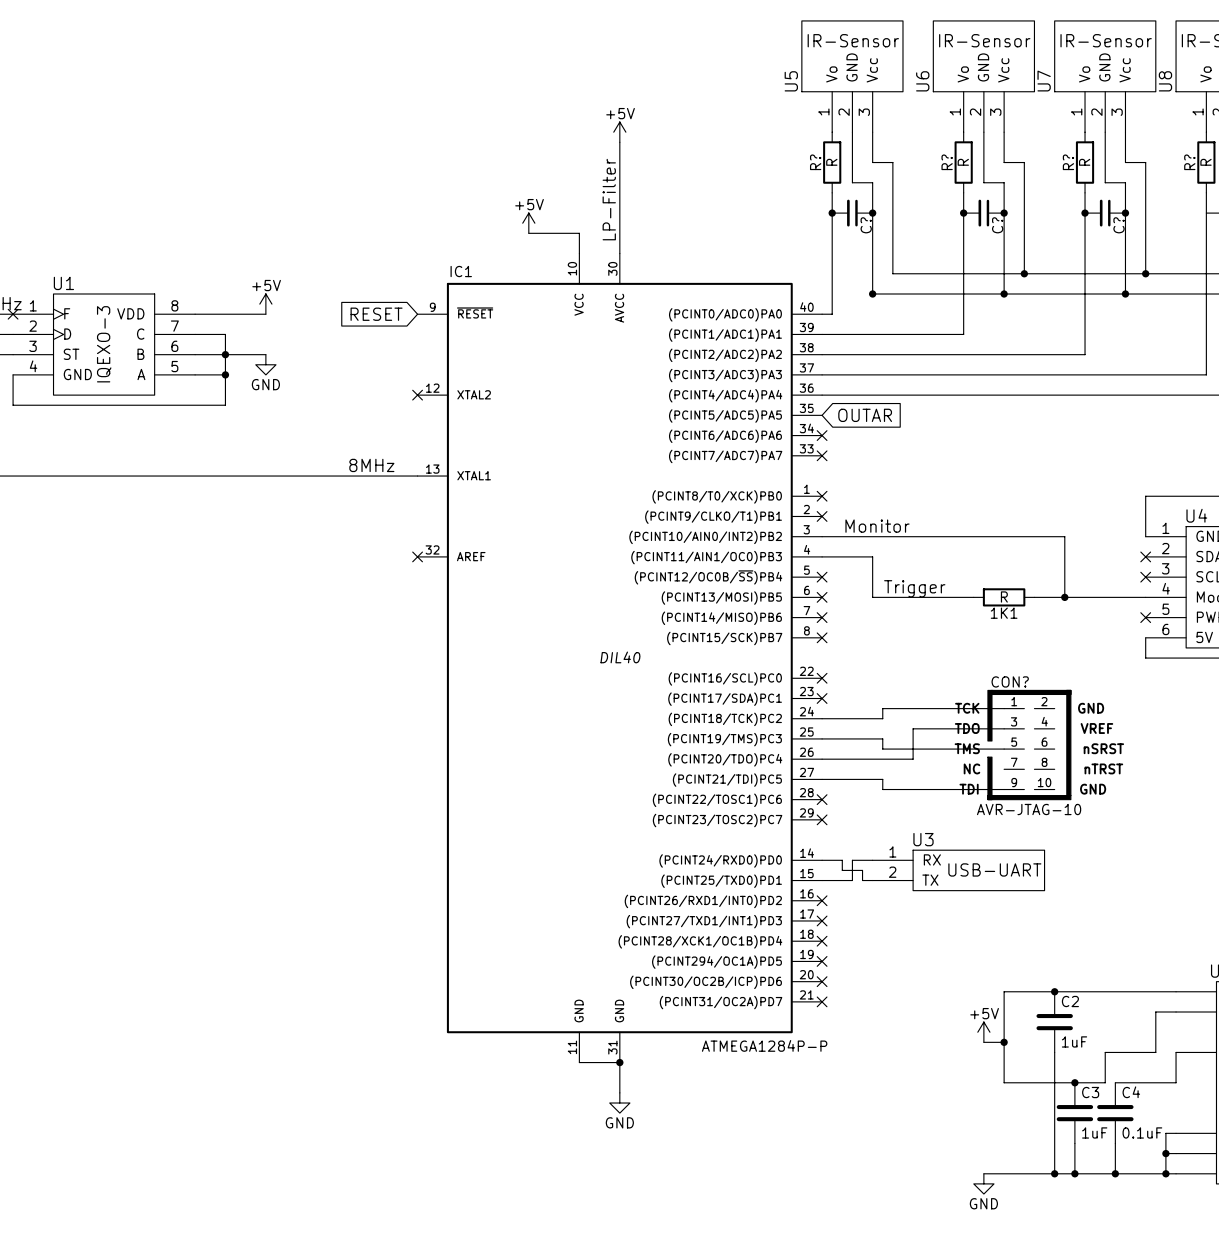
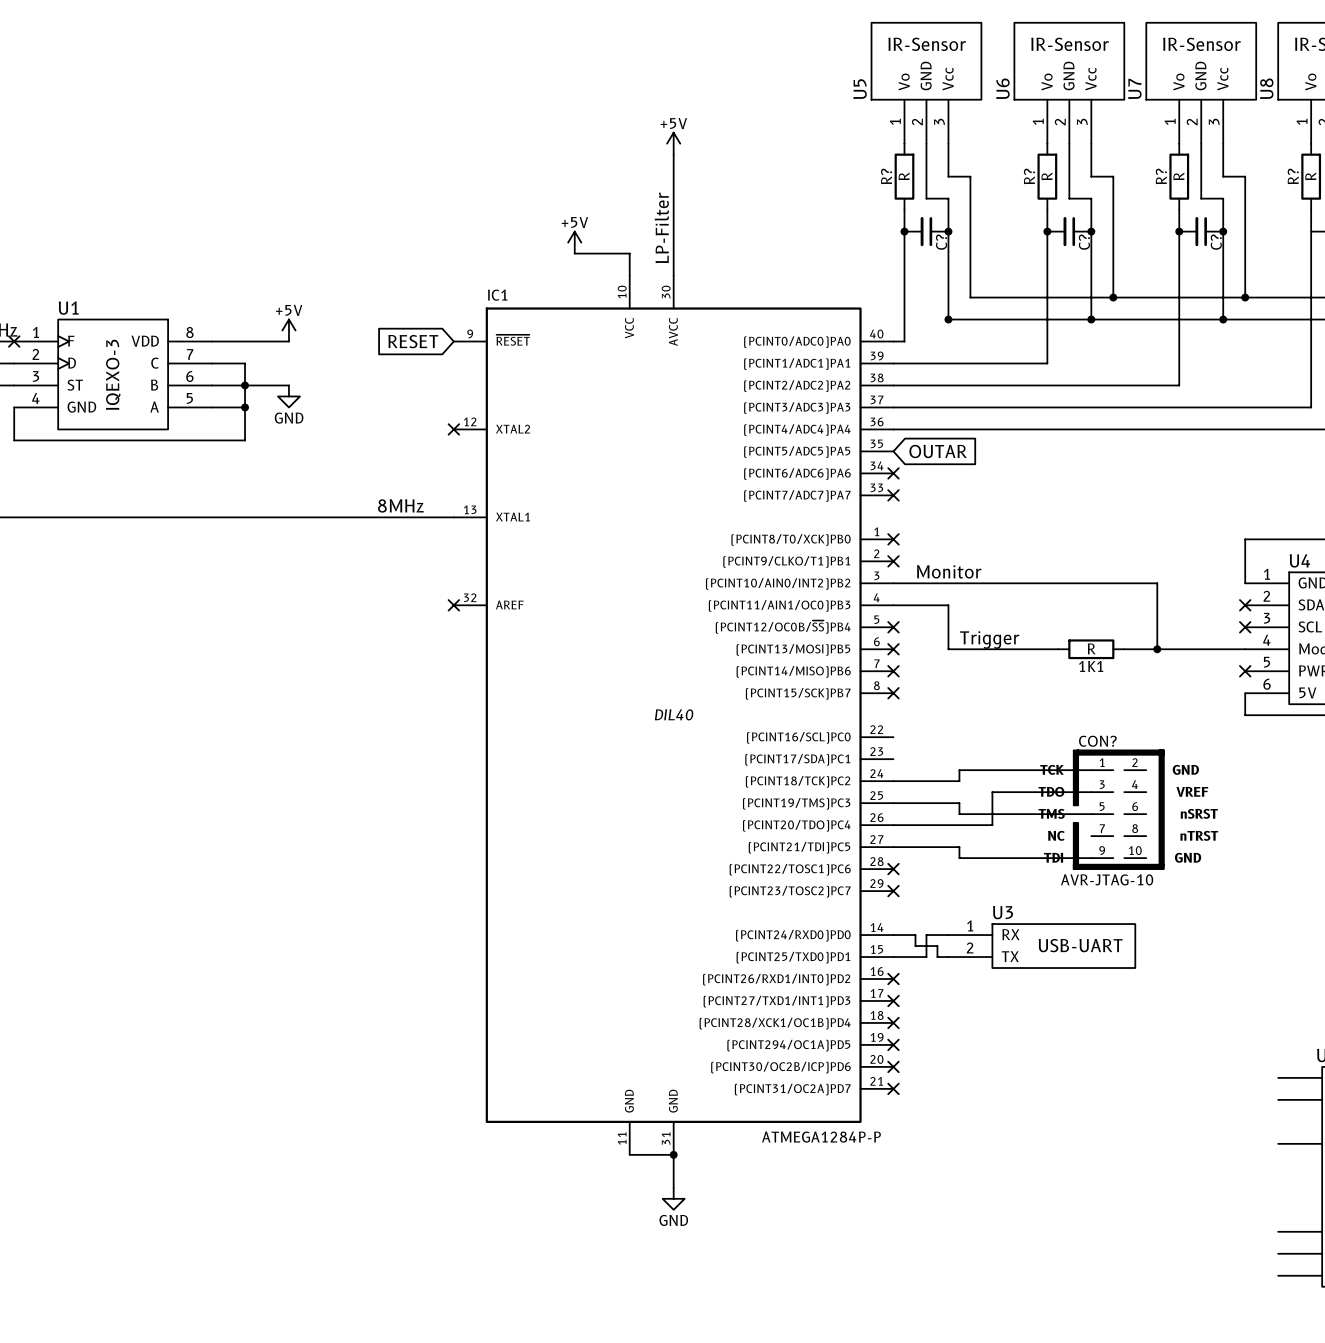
no-connect mark: (822, 678) -> none
no-connect mark: (822, 698) -> none
junction: (1054, 991) -> none
wire: (1176, 991) (1004, 991) (1004, 1082) (1105, 1082) (1105, 1052) (1155, 1052) (1155, 1011) (1176, 1011) -> none
C2: 1uF (1054, 1022) -> none
power symbol: +5V (983, 1032) -> none
wire: (983, 1042) (1004, 1042) -> none
junction: (1004, 1042) -> none
wire: (1054, 1052) (1054, 1173) -> none
wire: (1176, 1052) (1176, 1082) (1115, 1082) -> none
junction: (1074, 1082) -> none
C3: 1uF (1074, 1113) -> none
C4: 0.1uF (1115, 1113) -> none
wire: (1176, 1133) (1165, 1133) (1165, 1173) -> none
wire: (1074, 1143) (1074, 1173) -> none
wire: (1115, 1143) (1115, 1173) -> none
wire: (1165, 1153) (1176, 1153) -> none
junction: (1165, 1153) -> none
wire: (983, 1173) (1176, 1173) -> none
junction: (1054, 1173) -> none
junction: (1074, 1173) -> none
junction: (1115, 1173) -> none
junction: (1165, 1173) -> none
power symbol: GND (983, 1183) -> none

